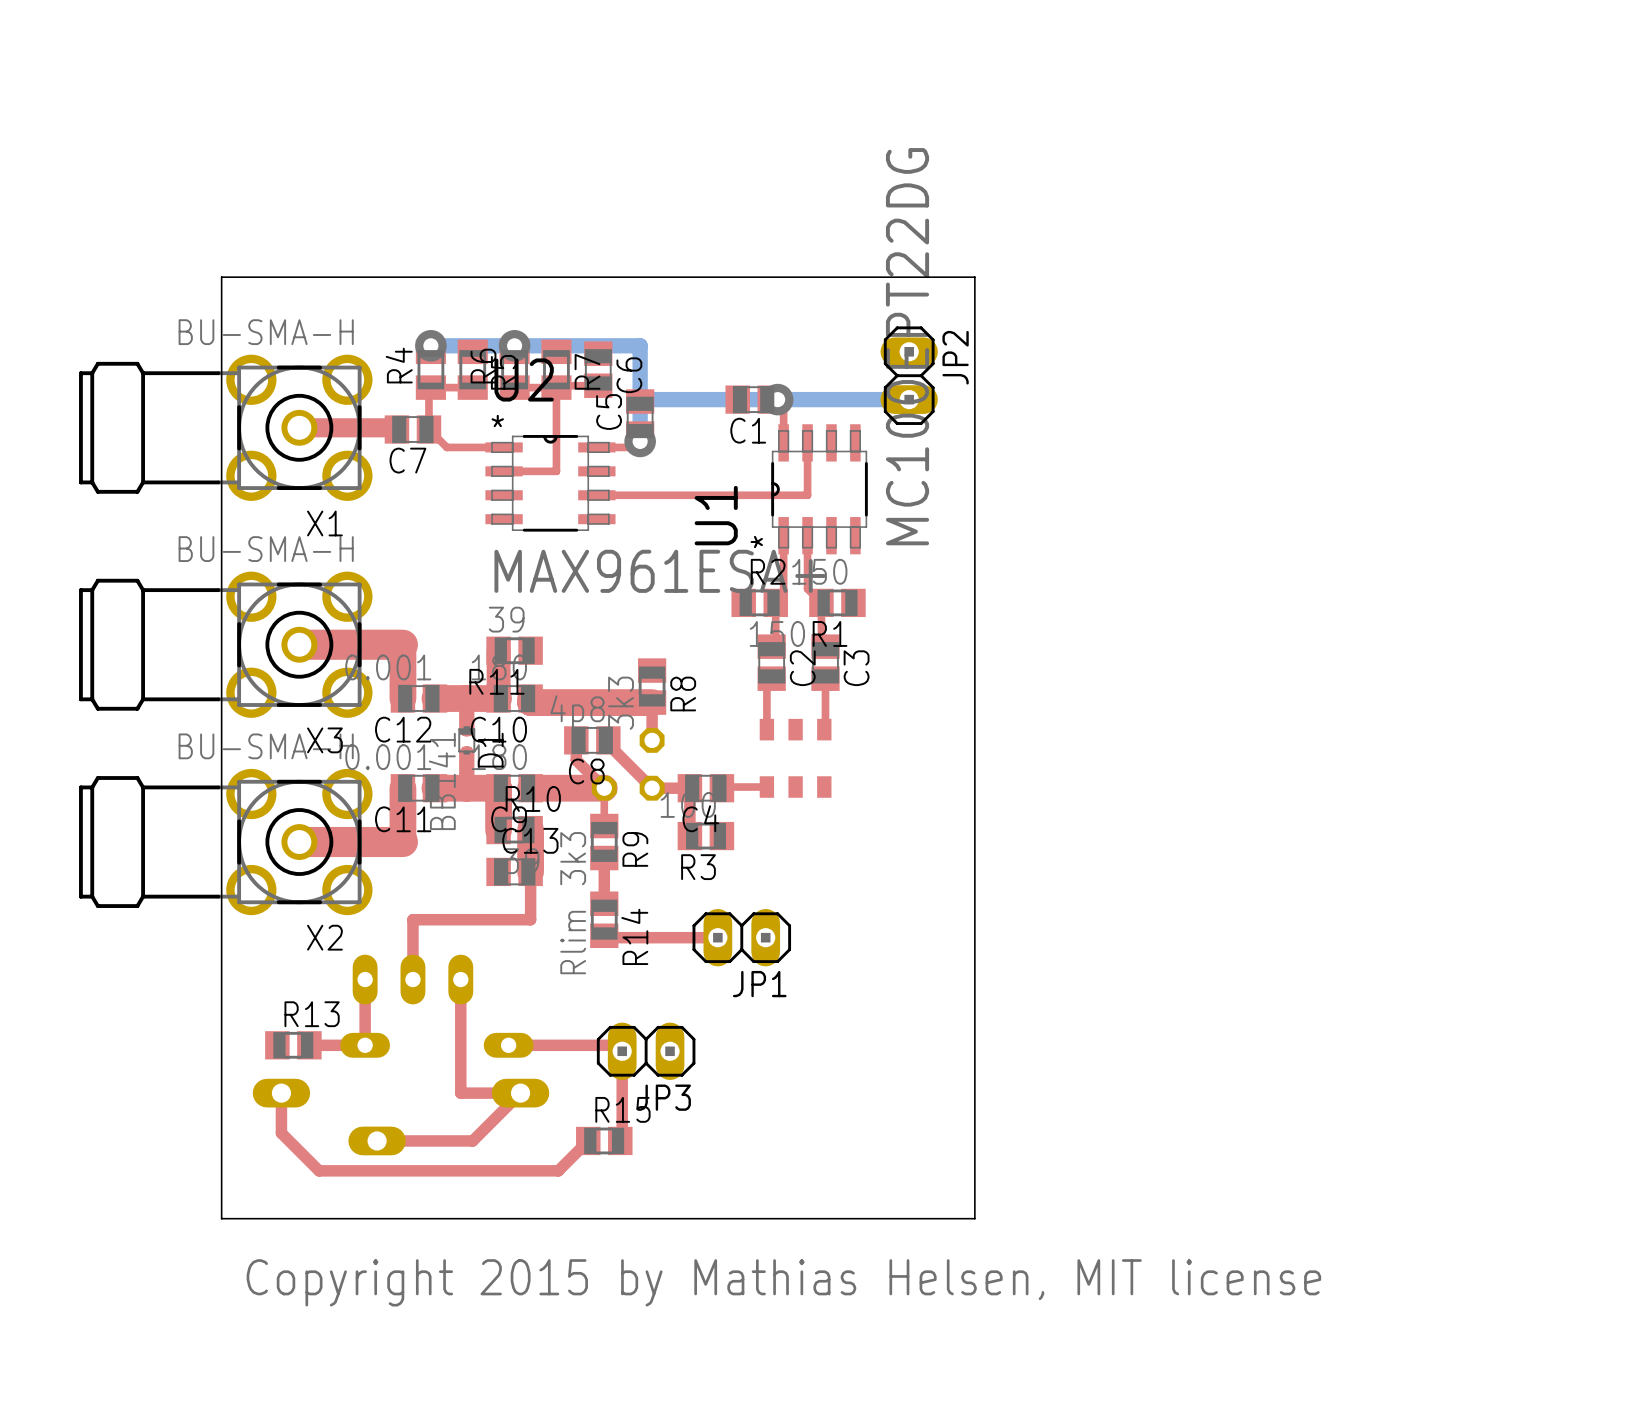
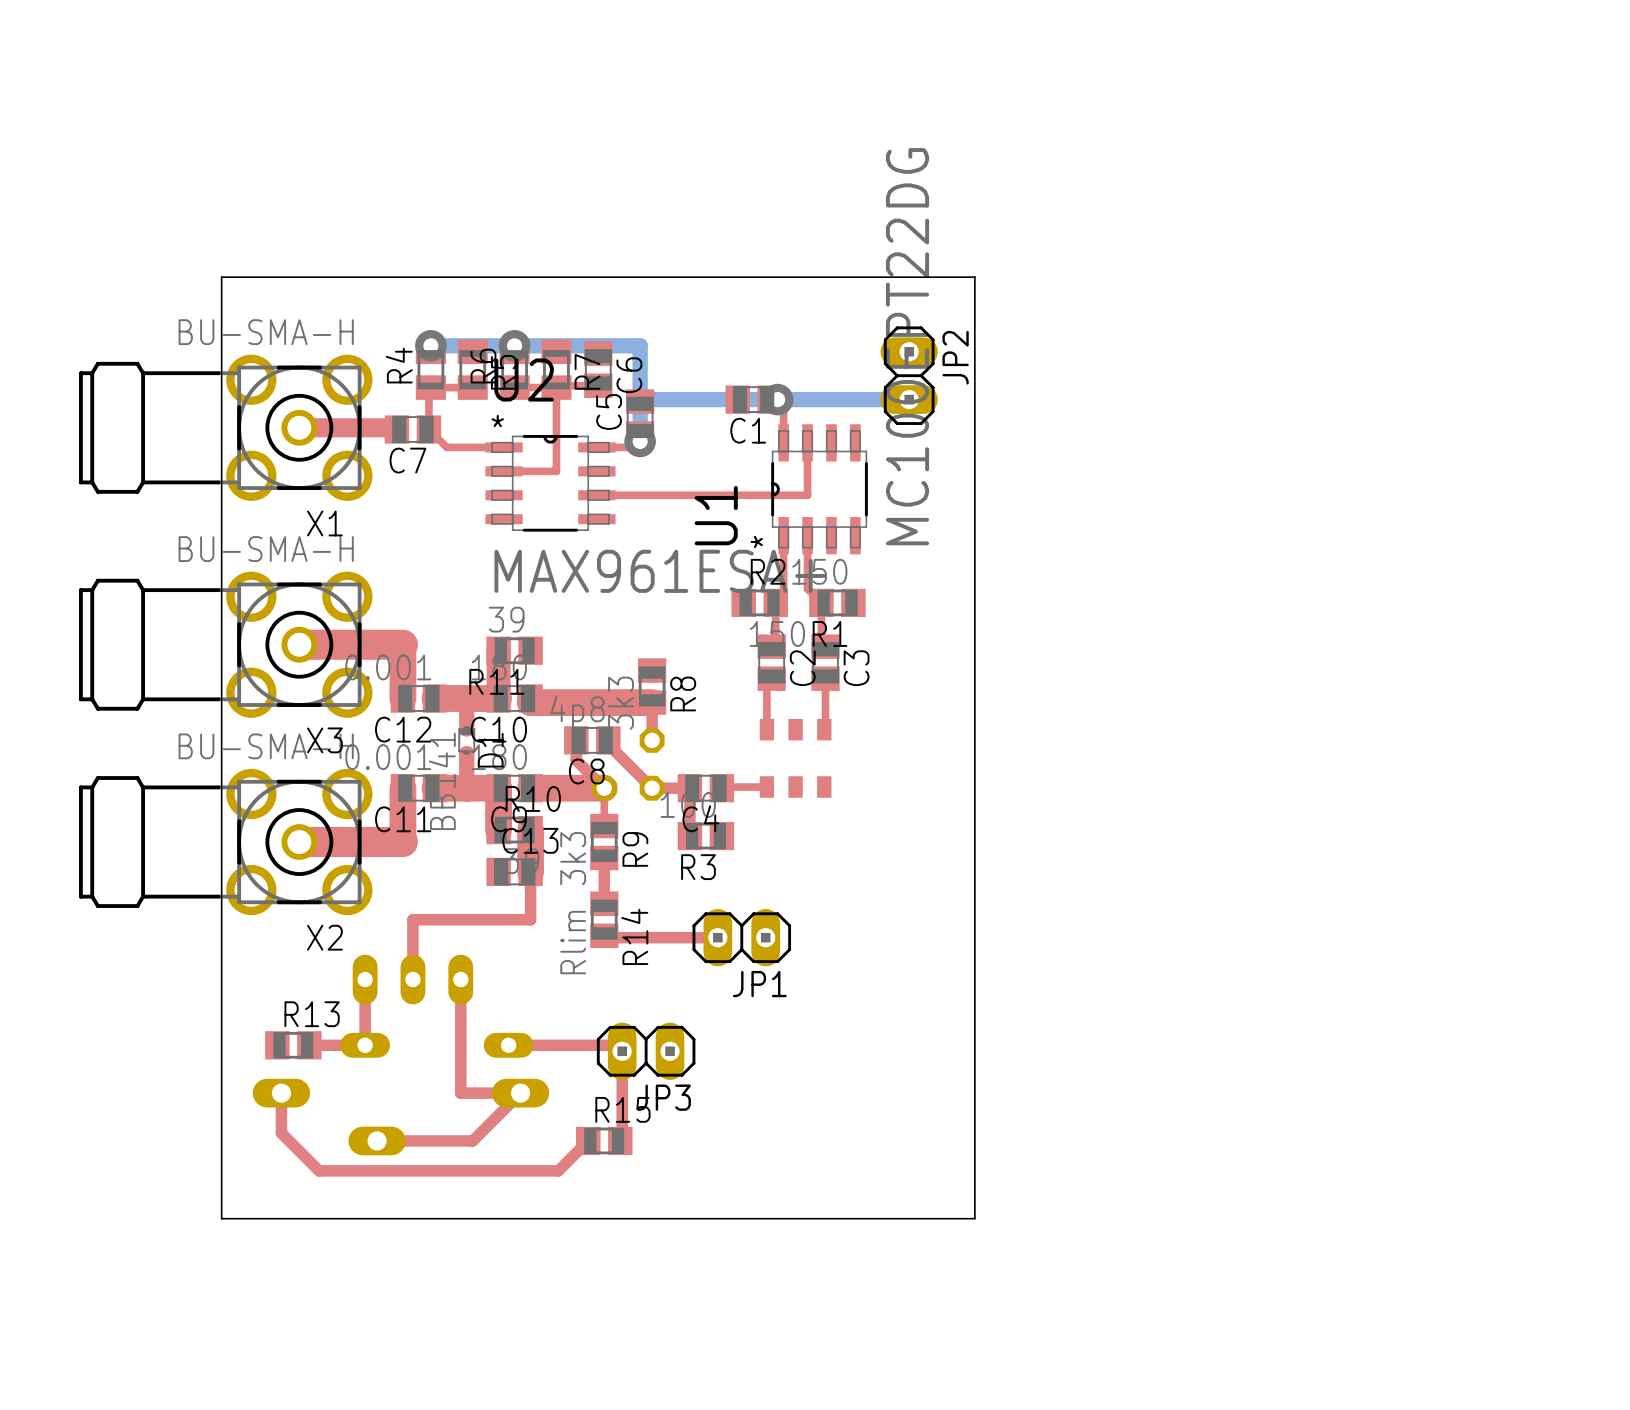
text: Copyright 2015 by Mathias Helsen, MIT license (783, 1282) -> none

